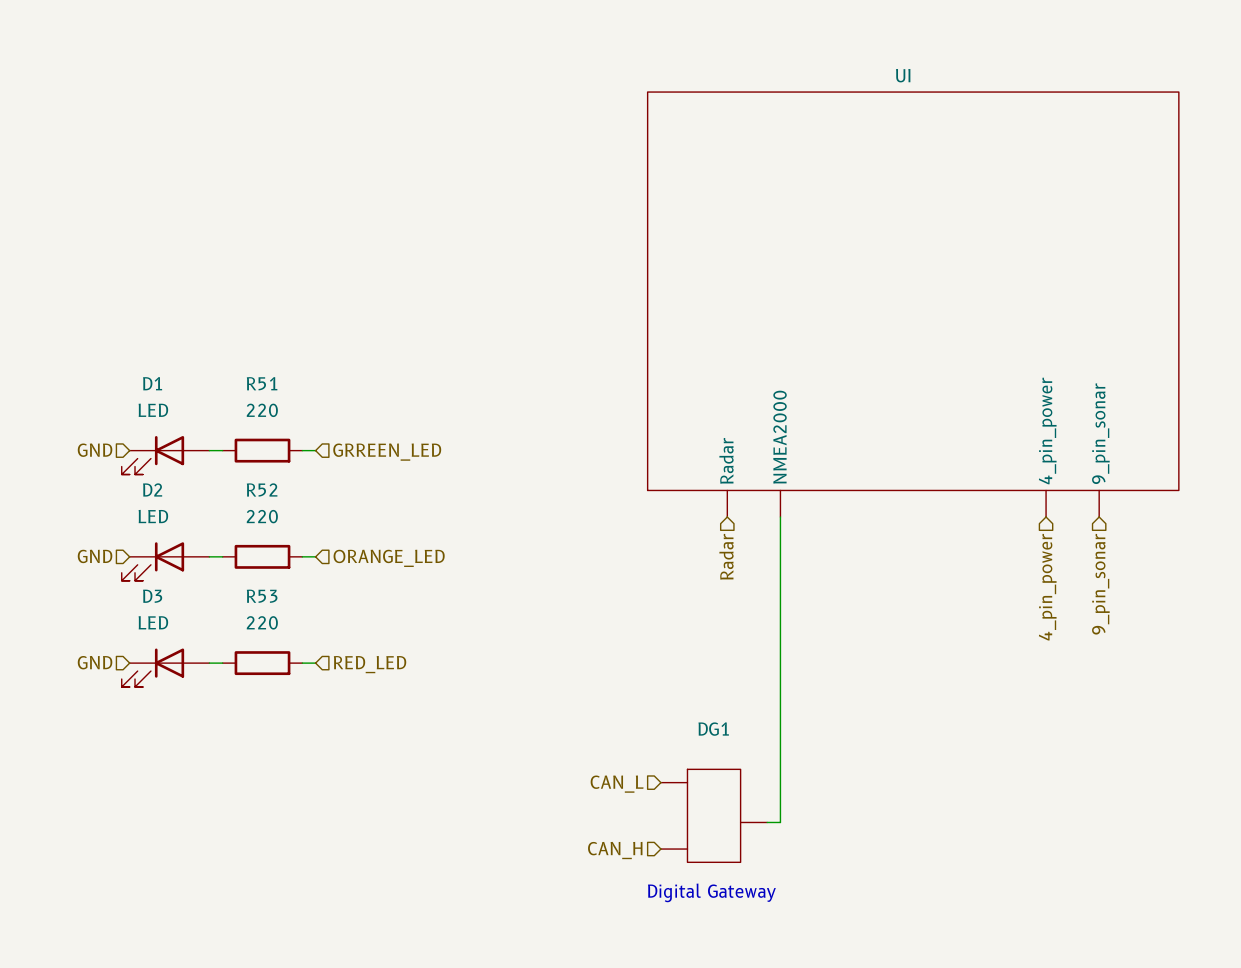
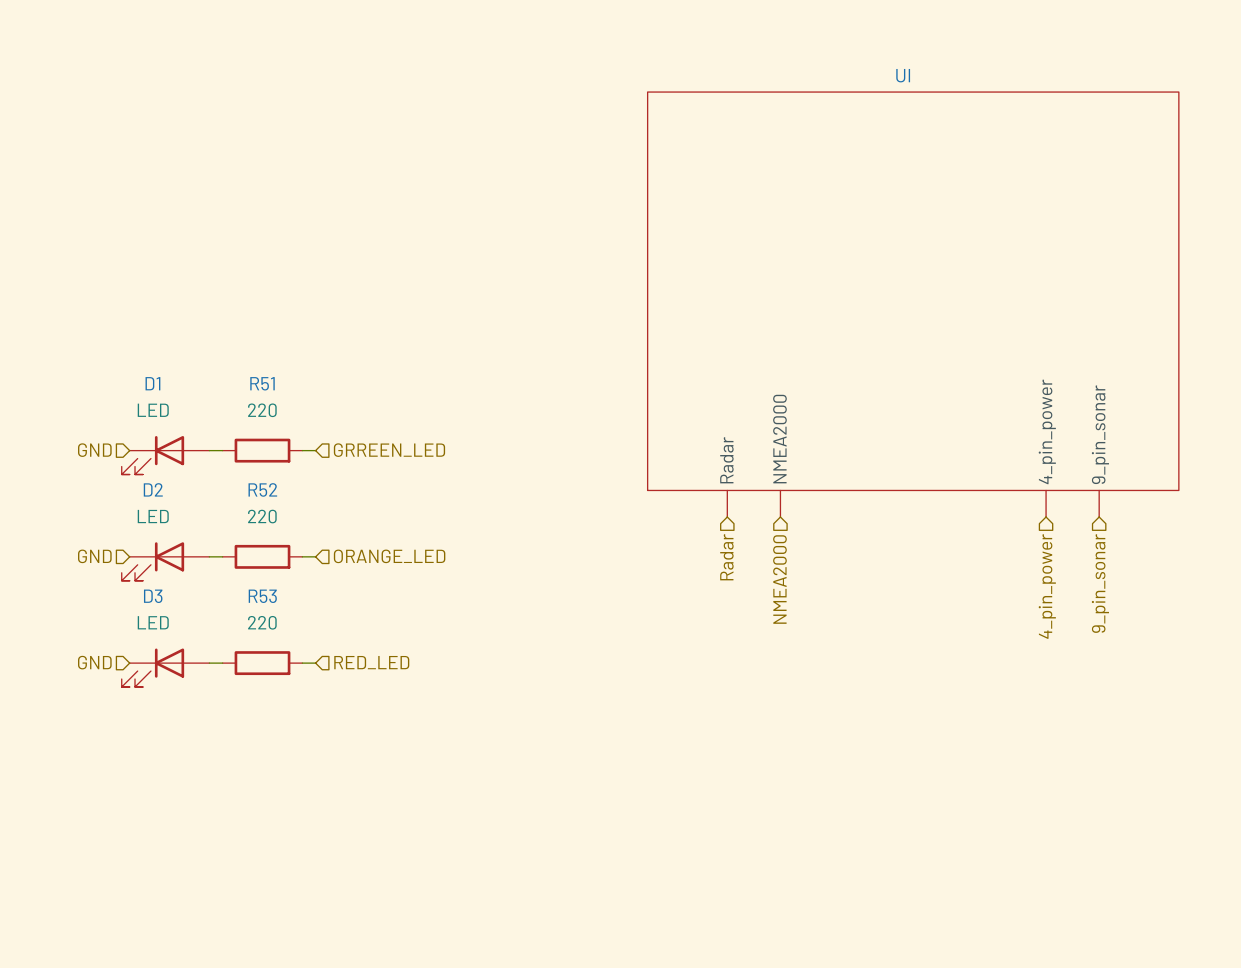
wire: (780, 517) (780, 822) (767, 822) -> none
hierarchical label: none -> NMEA2000 (779, 579)
hierarchical label: CAN_L (617, 784) -> none
DG1: (714, 815) -> none
hierarchical label: CAN_H (615, 850) -> none
text: Digital Gateway (711, 892) -> none

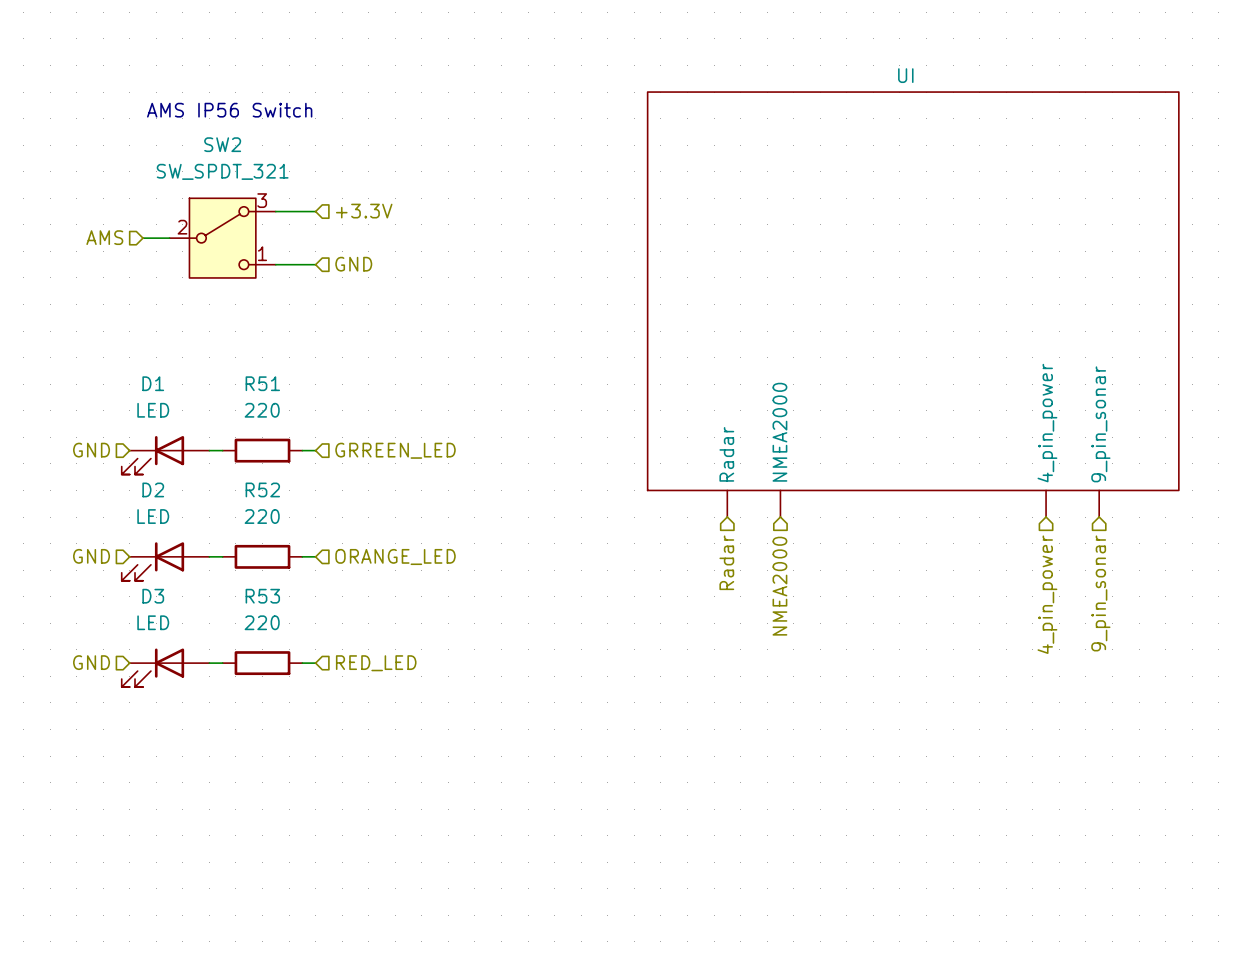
text: none -> AMS IP56 Switch (229, 110)
wire: none -> (275, 211) (315, 211)
hierarchical label: none -> +3.3V (364, 211)
hierarchical label: none -> AMS (104, 237)
wire: none -> (142, 238) (169, 238)
SW2: none -> SW_SPDT_321 (222, 238)
wire: none -> (275, 264) (315, 264)
hierarchical label: none -> GND (353, 264)

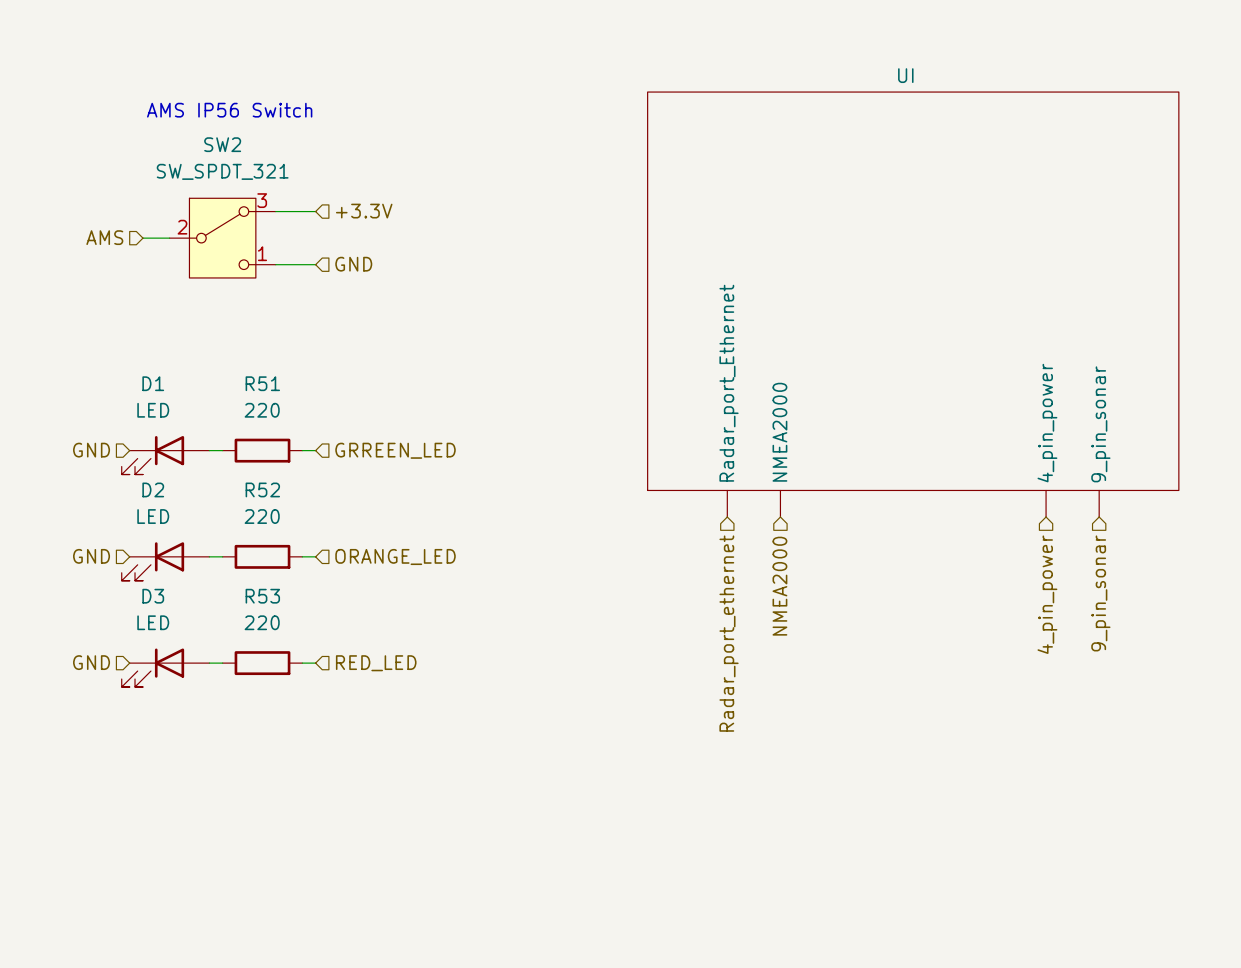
UI pin name: Radar (726, 454) -> Radar_port_Ethernet (729, 383)
hierarchical label: Radar (726, 562) -> Radar_port_ethernet (729, 633)

